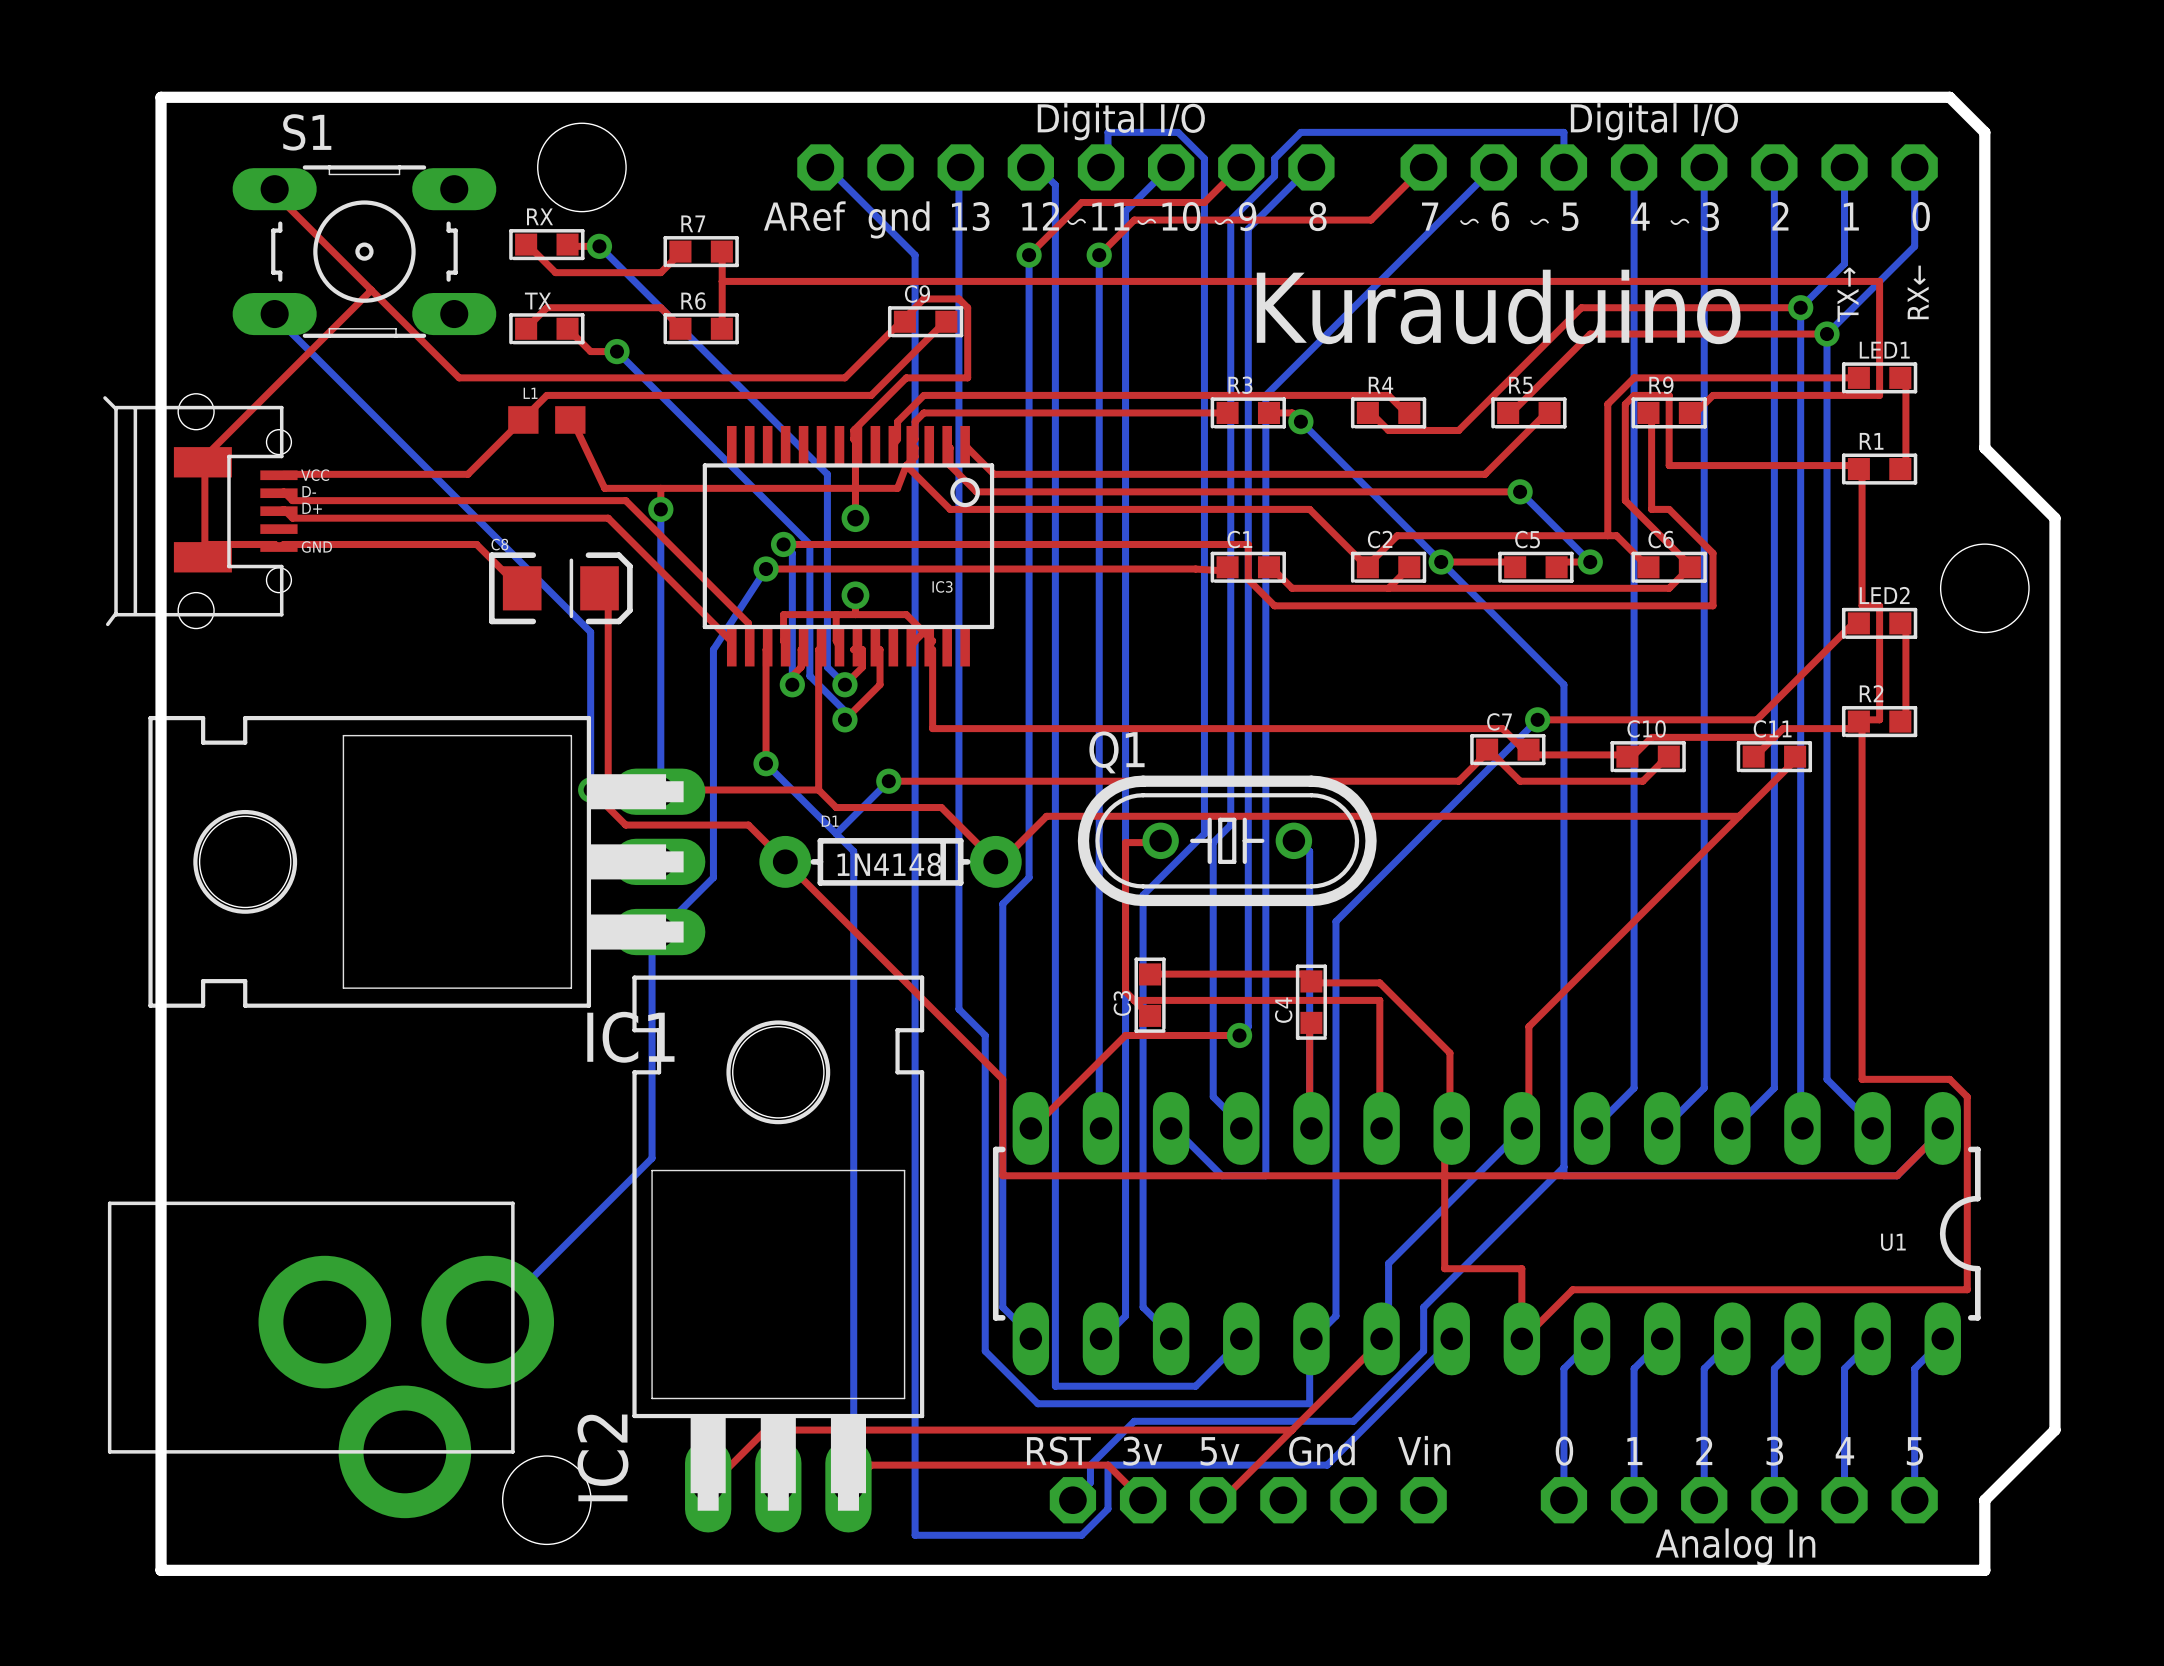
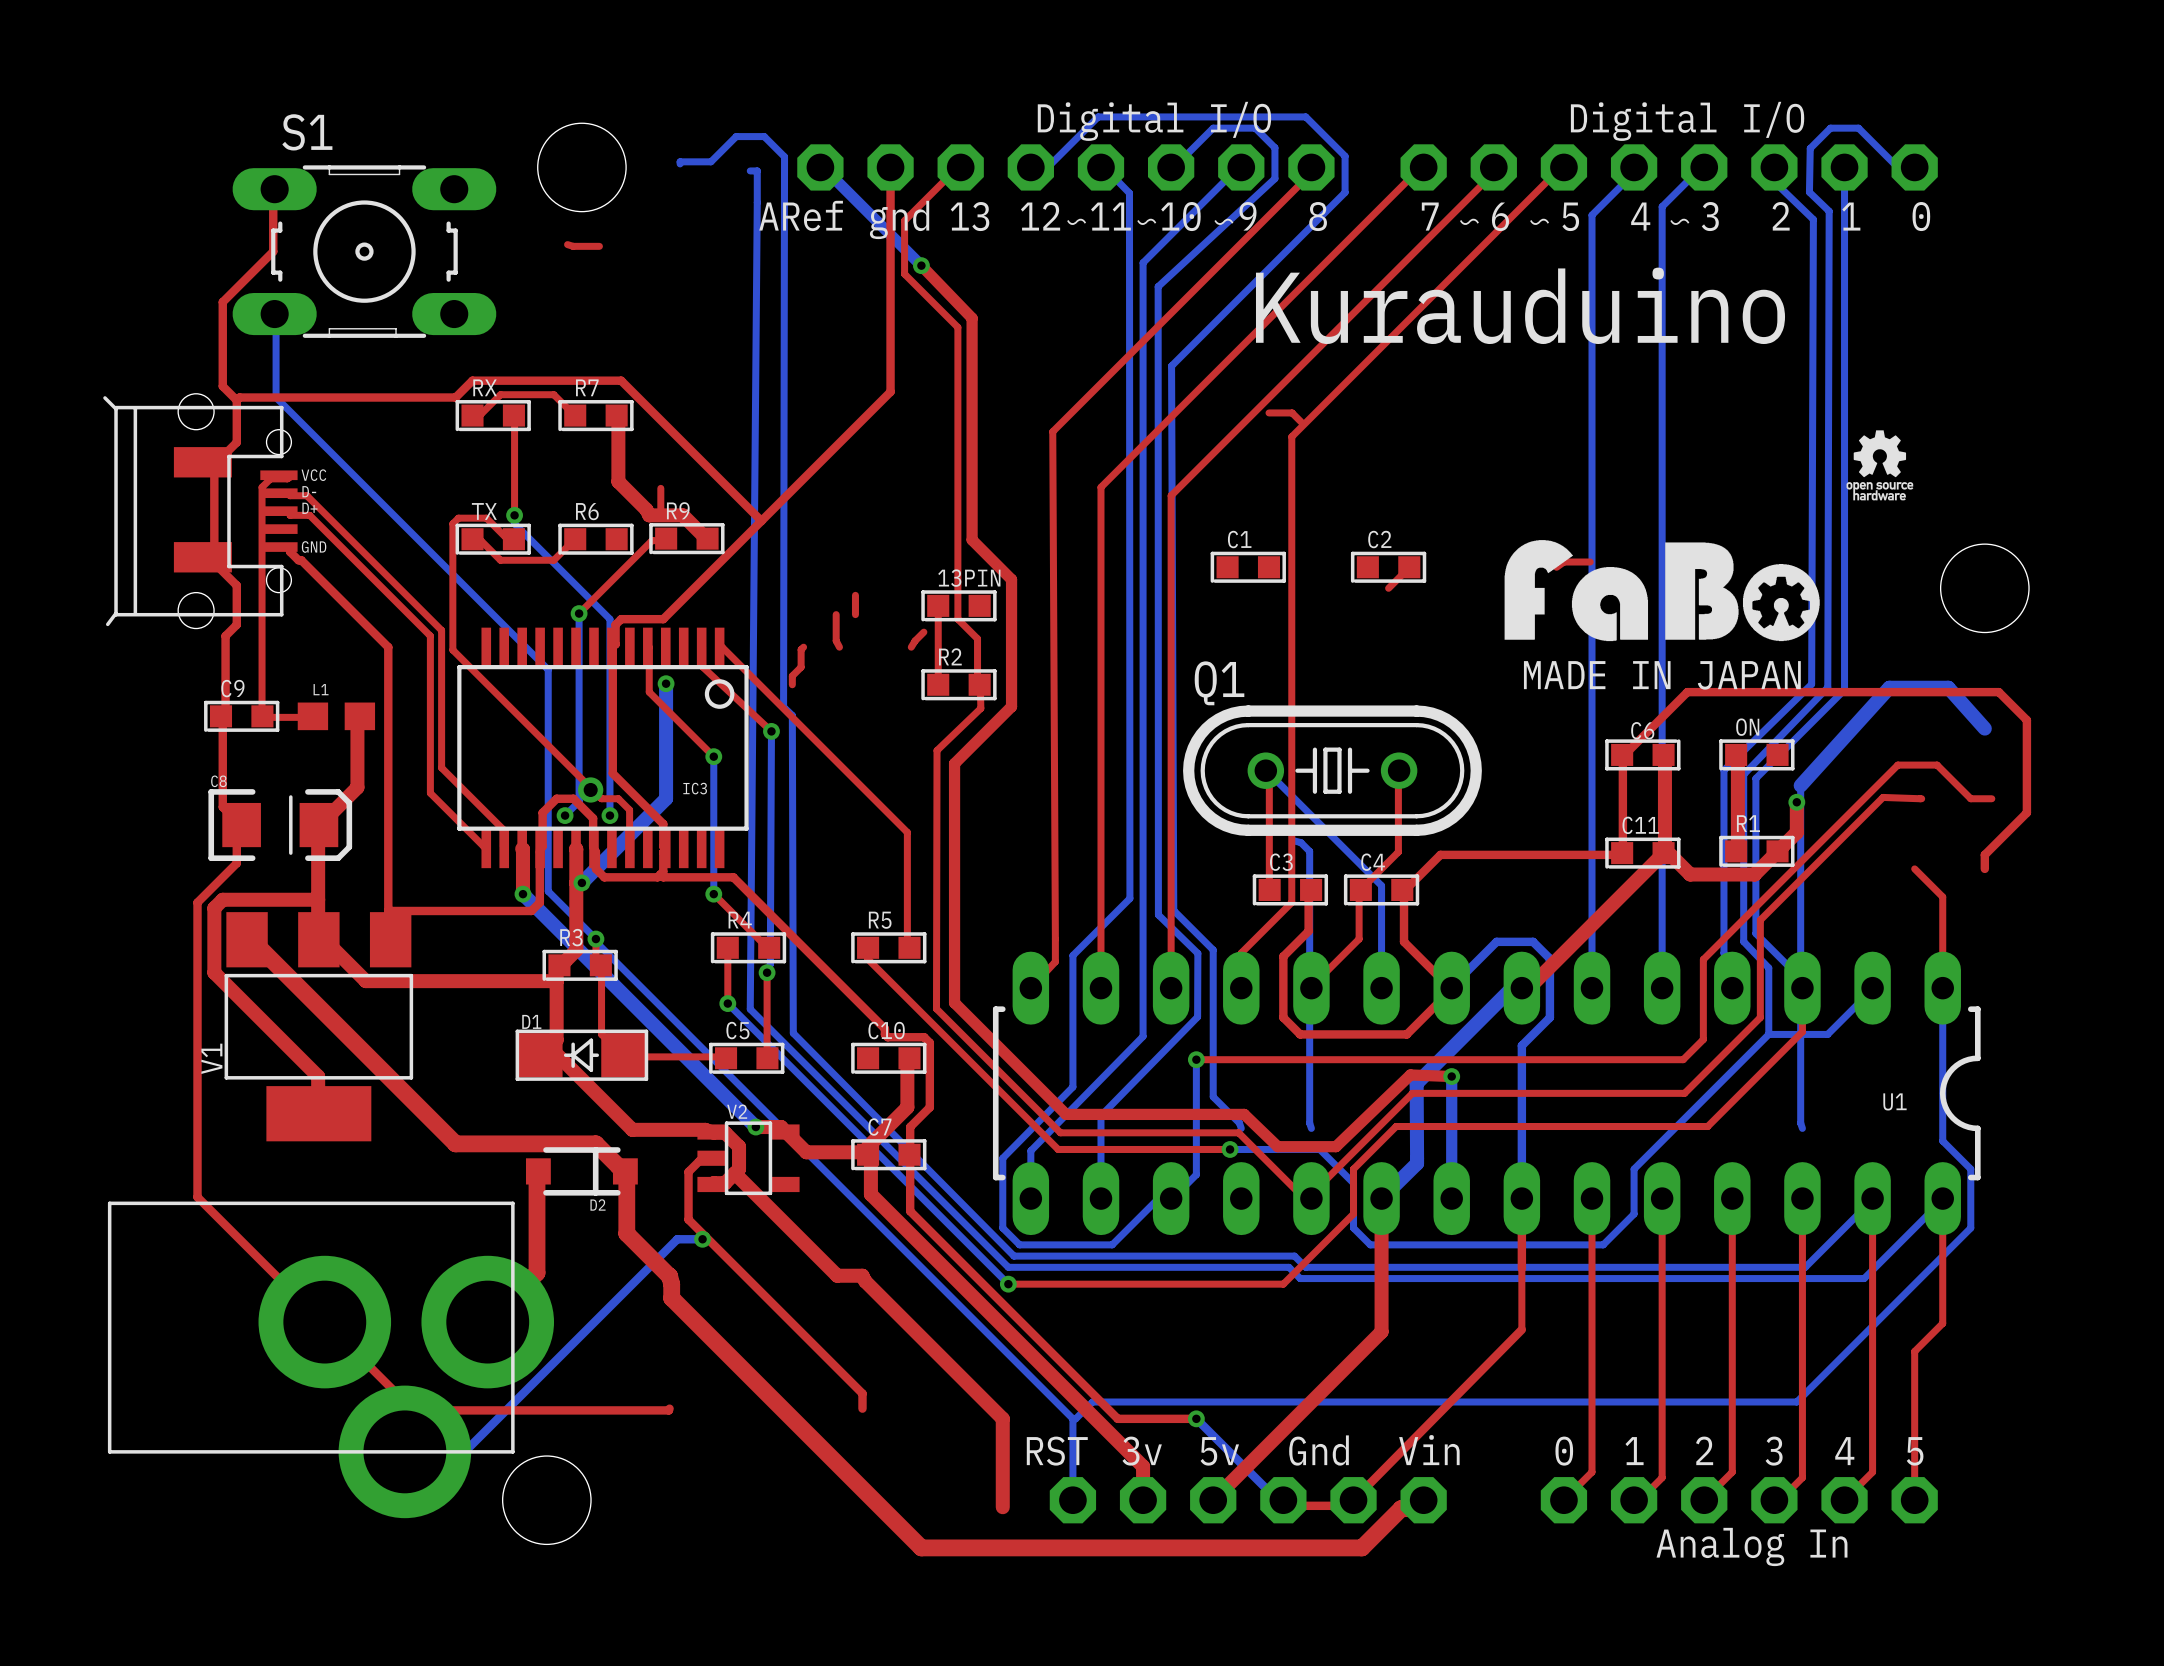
board edge: (161, 97) (1949, 97) (1984, 132) (1984, 448) (2054, 518) (2054, 1430) (1984, 1500) (1984, 1570) (161, 1570) (161, 97) -> none
bottom track: none -> (680, 163) (680, 161) (710, 161) (736, 136) (764, 136) (784, 156) (783, 707) (792, 715) (793, 1033) (1014, 1256) (1294, 1256) (1305, 1267) (1805, 1267) (1872, 1198)
bottom track: none -> (820, 163) (921, 265)
top track: none -> (960, 163) (904, 220) (904, 274) (957, 327) (957, 619) (977, 638) (977, 683) (980, 686) (980, 708) (937, 750) (936, 1008) (1060, 1132) (1238, 1132) (1303, 1197) (1311, 1197)
top track: none -> (1423, 163) (1100, 487) (1100, 988)
top track: none -> (1563, 163) (1291, 436) (1291, 902) (1241, 953) (1241, 988)
bottom track: none -> (1704, 163) (1662, 206) (1662, 988)
bottom track: (820, 167) (827, 167) (915, 255) (915, 1535) (1081, 1535) (1108, 1508) (1108, 1465) (1327, 1465) (1451, 1338) -> none
bottom track: (960, 167) (958, 167) (958, 1009) (985, 1035) (985, 1351) (1037, 1403) (1309, 1403) (1309, 1342) (1335, 1316) (1335, 921) (1537, 719) -> none
bottom track: (1030, 167) (1037, 167) (1055, 184) (1055, 1386) (1195, 1386) (1241, 1338) -> none
bottom track: (1100, 167) (1108, 167) (1108, 132) (1178, 132) (1204, 158) (1204, 833) (1143, 895) -> (1241, 163) (1143, 262) (1143, 895)
bottom track: (1171, 167) (1125, 211) (1125, 1316) (1100, 1338) -> none
top track: (1241, 167) (1204, 202) (1081, 202) (1029, 255) -> none
bottom track: (1311, 167) (1248, 228) (1248, 1026) (1239, 1035) -> none
top track: (1423, 167) (1371, 220) (1134, 220) (1099, 255) -> none
bottom track: (1493, 167) (1265, 395) (1265, 1175) (1221, 1175) (1178, 1131) (1171, 1128) -> none
bottom track: (1563, 167) (1563, 132) (1300, 132) (1274, 158) (1274, 176) (1230, 220) (1230, 825) (1213, 842) (1213, 950) -> (1030, 170) (1044, 170) (1098, 116) (1305, 116) (1345, 156) (1345, 192) (1171, 366) (1173, 910) (1213, 950)
bottom track: (1704, 167) (1704, 1088) (1662, 1128) -> none
bottom track: none -> (750, 170) (757, 170) (750, 1009) (1008, 1267) (1288, 1267) (1300, 1278) (1864, 1278) (1942, 1198)
top track: none -> (890, 170) (890, 391) (663, 619) (621, 619) (615, 624) (615, 644) (611, 646) (612, 773) (663, 824) (663, 846) (665, 848) (663, 852) (663, 871) (657, 877) (604, 877) (595, 868) (595, 852) (593, 846) (593, 818) (573, 798) (556, 798) (542, 812) (542, 846) (539, 852) (539, 902) (531, 910) (388, 910)
bottom track: none -> (1171, 170) (1213, 128) (1255, 128) (1274, 147) (1274, 178) (1158, 286) (1158, 914) (1197, 953) (1197, 1016) (1100, 1115) (1100, 1198)
top track: none -> (1311, 170) (1052, 431) (1055, 961) (1030, 988)
top track: none -> (1493, 170) (1171, 495) (1171, 988)
bottom track: (1914, 170) (1914, 246) (1826, 334) (1826, 1079) (1870, 1123) (1872, 1128) -> (1914, 170) (1900, 170) (1858, 128) (1830, 128) (1810, 148) (1809, 192) (1829, 211) (1827, 687) (1743, 774) (1743, 941) (1768, 967) (1768, 1034)
bottom track: (1634, 173) (1634, 1088) (1592, 1128) -> (1634, 173) (1592, 215) (1592, 988)
bottom track: (1774, 181) (1774, 1088) (1732, 1128) -> (1774, 181) (1813, 219) (1811, 684) (1723, 770) (1723, 953) (1732, 988)
top track: (274, 189) (275, 193) (459, 377) (844, 377) (897, 325) (904, 321) (906, 316) (923, 298) (958, 298) (967, 307) (967, 377) (906, 377) (853, 430) (853, 439) (857, 445) (855, 445) (855, 518) -> (274, 189) (273, 251) (222, 302) (222, 386) (236, 400)
top track: (526, 244) (555, 272) (660, 272) (680, 251) -> none
RX position: (546, 244) -> (493, 415)
bottom track: (599, 246) (827, 474) (827, 667) (844, 684) -> none
via: (599, 246) -> none
R7 position: (701, 251) -> (595, 415)
top track: (721, 251) (721, 328) -> none
bottom track: (1029, 255) (1029, 877) (1002, 903) (1002, 1158) -> (1100, 163) (1129, 193) (1129, 898) (1072, 955) (1072, 1087) (1002, 1158)
via: (1029, 255) -> none
bottom track: (1099, 255) (1099, 1123) (1100, 1128) -> none
via: (1099, 255) -> none
bottom track: (1844, 263) (1800, 307) (1800, 785) -> (1844, 263) (1844, 689) (1755, 778) (1755, 933) (1802, 980) (1802, 988)
top track: none -> (921, 265) (972, 318) (972, 539) (1011, 579) (1011, 706) (954, 763) (954, 1002) (1066, 1114) (1244, 1114) (1277, 1146) (1335, 1146) (1410, 1074) (1451, 1076)
via: none -> (921, 265)
top track: (722, 281) (1879, 281) (1879, 395) (1713, 395) (1695, 412) (1689, 412) -> none
top track: (371, 290) (204, 456) (202, 462) (204, 465) (204, 544) (275, 544) (278, 547) (283, 544) (476, 544) (522, 588) -> none
text: RX← (1918, 292) -> none
text: TX→ (1848, 294) -> none
top track: (1800, 307) (1581, 307) (1458, 430) (1388, 430) (1371, 412) (1367, 412) -> none
via: (1800, 307) -> none
bottom track: (274, 314) (590, 632) (590, 789) -> (274, 314) (276, 397) (548, 669) (548, 891) (595, 939) (595, 941) (1072, 1418)
C9 position: (925, 321) -> (241, 716)
top track: (946, 321) (871, 395) (546, 395) (467, 474) (278, 475) -> none
top track: (526, 328) (546, 307) (660, 307) (680, 328) -> none
TX position: (546, 328) -> (493, 539)
top track: (567, 328) (590, 351) (616, 351) -> none
R6 position: (701, 328) -> (595, 539)
top track: (1826, 334) (1590, 334) (1511, 412) (1508, 412) -> none
via: (1826, 334) -> none
bottom track: (616, 351) (809, 544) (809, 676) (844, 711) (844, 719) -> none
via: (616, 351) -> none
top track: (1858, 377) (1634, 377) (1607, 404) (1607, 535) -> none
LED1: (1879, 377) -> none
top track: (1900, 377) (1905, 377) (1905, 465) (1900, 469) -> none
top track: none -> (236, 400) (236, 442) (213, 464) (213, 559) (214, 563) (236, 585) (236, 624) (225, 636) (225, 714) (220, 716) (222, 717) (222, 807) (241, 825) (236, 826) (236, 863) (197, 902) (197, 1197) (427, 1424) (404, 1451) (444, 1410) (668, 1410) (669, 1408)
top track: none -> (236, 400) (239, 397) (455, 397) (472, 380) (621, 380) (761, 520)
top track: (1227, 412) (923, 412) (915, 421) (915, 439) (911, 445) (915, 448) (915, 456) (906, 465) -> none
R3 position: (1248, 412) -> (580, 965)
R4 position: (1388, 412) -> (748, 947)
top track: (1409, 412) (1406, 412) (1388, 395) (923, 395) (897, 421) (897, 439) (893, 445) -> none
R5 position: (1528, 412) -> (888, 947)
top track: (1549, 412) (1546, 412) (1485, 474) (994, 474) (965, 445) -> none
top track: (1648, 412) (1651, 412) (1651, 509) (1669, 509) (1713, 553) (1713, 605) (1274, 605) (1248, 579) (1248, 544) (783, 544) -> none
R9 position: (1669, 412) -> (686, 538)
top track: none -> (472, 415) (480, 414) (500, 394) (553, 394) (575, 415)
top track: none -> (513, 415) (514, 515)
top track: none -> (616, 415) (618, 417) (618, 481) (646, 509) (649, 515) (682, 515) (707, 538)
L1 position: (546, 419) -> (336, 716)
top track: (570, 419) (573, 421) (604, 488) (897, 488) (906, 465) -> none
bottom track: (1300, 421) (1563, 684) (1563, 1175) (1897, 1175) (1942, 1128) -> none
via: (1300, 421) -> none
drawing: none -> [1846, 430, 1914, 501]
top track: (947, 445) (950, 448) (950, 465) (976, 491) (1520, 491) -> none
top track: (906, 465) (950, 509) (1309, 509) (1367, 567) (1397, 535) (1616, 535) (1648, 567) -> none
R1 position: (1879, 469) -> (1756, 851)
top track: none -> (289, 477) (270, 478) (262, 487) (262, 714) (264, 717) (312, 716)
bottom track: (1520, 491) (1590, 562) -> none
via: (1520, 491) -> none
top track: (278, 493) (283, 491) (292, 500) (625, 500) (748, 623) (749, 647) -> none
top track: none -> (290, 495) (306, 495) (441, 630) (441, 767) (503, 829) (504, 848)
bottom track: (660, 509) (660, 789) (659, 791) -> none
via: (660, 509) -> none
top track: (278, 511) (283, 509) (292, 518) (458, 518) -> (629, 848) (629, 809) (618, 798) (601, 798) (452, 650) (452, 523) (458, 518)
top track: none -> (289, 513) (290, 515) (309, 515) (430, 636) (430, 793) (486, 848)
bottom track: none -> (514, 515) (514, 523) (609, 619) (609, 815)
via: none -> (514, 515)
top track: (486, 518) (608, 518) (730, 640) (731, 647) -> (486, 518) (506, 537) (513, 539)
via: (855, 518) -> none
top track: none -> (666, 538) (666, 540) (652, 540) (579, 613)
top track: none -> (472, 539) (480, 540) (500, 560) (553, 560) (575, 539)
drawing: none -> [1504, 540, 1820, 642]
bottom track: (783, 544) (792, 553) (792, 684) -> none
via: (783, 544) -> none
IC3 position: (848, 546) -> (602, 747)
top track: none -> (289, 549) (298, 560) (301, 560) (388, 647) (388, 939) (390, 939)
top track: (1441, 562) (1511, 562) (1515, 567) -> none
via: (1441, 562) -> none
via: (1590, 562) -> none
top track: (1227, 567) (1221, 570) (1195, 569) (766, 569) -> none
top track: (1269, 567) (1292, 588) (1669, 588) (1689, 567) (1625, 500) (1625, 404) (1634, 395) (1669, 395) (1669, 465) (1853, 465) (1862, 474) (1862, 605) (1879, 605) (1879, 719) (1858, 721) -> none
C5 position: (1535, 567) -> (746, 1058)
C6 rotation: 0° (1669, 567) -> 180° (1642, 754)
C6 position: (1669, 567) -> (1642, 754)
bottom track: (766, 569) (713, 649) (713, 877) (652, 939) (652, 1158) (487, 1322) -> none
via: (766, 569) -> none
C8 position: (560, 588) -> (280, 825)
top track: (599, 588) (608, 588) (608, 781) (643, 781) (652, 789) (659, 791) (660, 789) (818, 789) -> none
via: (855, 595) -> none
top track: none -> (938, 605) (938, 684)
13PIN: none -> (958, 605)
bottom track: none -> (579, 613) (579, 801) (565, 815)
via: none -> (579, 613)
top track: (1858, 623) (1853, 623) (1756, 719) (1537, 719) -> none
LED2: (1879, 623) -> none
top track: (1900, 623) (1905, 623) (1905, 719) (1900, 721) -> none
top track: none -> (647, 646) (649, 692) (713, 756)
top track: none -> (701, 646) (702, 666) (771, 731)
top track: none -> (719, 646) (722, 647) (907, 832) (907, 947) (909, 947)
top track: (767, 647) (766, 649) (766, 763) -> none
top track: (785, 647) (783, 640) (783, 614) (906, 614) (932, 640) (929, 647) (932, 649) (932, 728) (1502, 728) (1520, 746) (1528, 749) (1528, 754) (1625, 754) (1627, 756) (1634, 754) (1651, 737) (1774, 737) -> none
top track: (821, 647) (818, 649) (818, 789) -> none
top track: (857, 647) (853, 649) (862, 649) (862, 667) (844, 684) -> none
top track: (875, 647) (880, 649) (880, 684) (844, 719) -> none
text: none -> MADE IN JAPAN (1662, 675)
bottom track: none -> (666, 683) (666, 798) (581, 882)
via: none -> (666, 683)
via: (792, 684) -> none
via: (844, 684) -> none
top track: none -> (359, 716) (357, 717) (357, 787) (318, 825) (318, 939) (323, 944) (329, 944) (365, 981) (556, 981)
via: (844, 719) -> none
via: (1537, 719) -> none
top track: (1858, 721) (1862, 728) (1862, 1079) (1949, 1079) (1967, 1096) (1967, 1289) (1572, 1289) (1521, 1338) (1521, 1329) -> (1283, 1507) (1347, 1505) (1521, 1329)
top track: (1858, 721) (1853, 728) (1783, 728) (1753, 756) -> none
R2 position: (1879, 721) -> (958, 684)
bottom track: none -> (1984, 728) (1948, 687) (1889, 687) (1800, 785)
bottom track: none -> (771, 731) (770, 963) (767, 972)
via: none -> (771, 731)
C7 position: (1507, 749) -> (888, 1154)
top track: none -> (1663, 754) (1663, 853)
top track: none -> (1736, 754) (1737, 756) (1737, 849) (1736, 851)
ON: none -> (1756, 754)
bottom track: none -> (713, 756) (713, 894)
via: none -> (713, 756)
C10 position: (1648, 756) -> (888, 1058)
top track: (1668, 756) (1642, 781) (1520, 781) (1487, 749) (1485, 754) (1458, 781) (888, 781) -> none
C11 position: (1774, 756) -> (1642, 853)
top track: (1795, 756) (1791, 763) (1528, 1026) (1528, 1123) (1521, 1128) -> none
bottom track: (766, 763) (853, 851) (853, 1482) (848, 1486) -> none
via: (766, 763) -> none
top track: none -> (1265, 770) (1269, 773) (1269, 889)
bottom track: none -> (1265, 770) (1381, 885) (1381, 988)
top track: none -> (1399, 770) (1398, 852) (1359, 891) (1359, 939) (1311, 988)
bottom track: (888, 781) (836, 833) -> none
via: (888, 781) -> none
top track: (590, 789) (625, 825) (748, 825) (1002, 1079) (1002, 1175) (1897, 1175) (1942, 1128) -> none
top track: (818, 789) (836, 807) (941, 807) (995, 861) (1002, 860) (1046, 816) (1739, 816) -> none
top track: none -> (1921, 798) (1883, 797) (1760, 920) (1760, 1017) (1684, 1093) (1412, 1093) (1311, 1194) (1311, 1198)
top track: none -> (1991, 798) (1970, 798) (1937, 765) (1897, 765) (1703, 959) (1703, 1039) (1683, 1059) (1196, 1059)
top track: none -> (1796, 802) (1796, 832) (1754, 874) (1690, 874) (1670, 854) (1663, 853)
via: none -> (1796, 802)
via: none -> (565, 815)
via: none -> (609, 815)
D1 footprint: [759, 835, 1022, 888] -> [515, 1029, 649, 1081]
top track: (1160, 840) (1160, 842) (1125, 842) (1125, 991) (1150, 1015) -> none
Q1 position: (1227, 840) -> (1332, 770)
top track: none -> (522, 848) (522, 894)
top track: none -> (576, 849) (576, 950) (556, 967) (556, 1040) (540, 1055) (553, 1051) (632, 1129) (705, 1129) (713, 1132) (725, 1132) (739, 1146) (739, 1169) (725, 1183) (711, 1184)
top track: none -> (1663, 853) (1530, 986) (1521, 988)
IC1: (426, 861) -> none
D1 value: 1N4148 (889, 864) -> none
top track: none -> (1914, 868) (1942, 896) (1942, 988)
top track: none -> (1984, 868) (1984, 854) (2026, 812) (2026, 720) (1998, 692) (1687, 692) (1625, 753) (1622, 754) (1622, 852) (1620, 854) (1440, 854) (1406, 888) (1402, 889) (1404, 891) (1404, 941) (1451, 988) (1406, 1034) (1300, 1034) (1283, 1017) (1283, 956) (1308, 931) (1308, 891) (1311, 889)
top track: none -> (660, 874) (663, 877) (733, 877) (884, 1028) (884, 1034) (887, 1037) (924, 1037) (929, 1042) (929, 1107) (910, 1127) (910, 1211) (1117, 1418) (1196, 1418)
via: none -> (581, 882)
bottom track: none -> (522, 894) (755, 1127)
via: none -> (522, 894)
top track: none -> (713, 894) (769, 947)
via: none -> (713, 894)
top track: none -> (318, 899) (222, 899) (214, 908) (214, 972) (318, 1076) (318, 1113)
top track: none -> (247, 939) (248, 941) (253, 941) (455, 1143) (595, 1143) (618, 1166) (626, 1171) (626, 1233) (669, 1276) (671, 1298) (921, 1547) (1361, 1547) (1401, 1508) (1423, 1507)
top track: none -> (595, 939) (595, 961) (601, 967) (601, 1034) (623, 1056) (726, 1058)
via: none -> (595, 939)
top track: none -> (727, 947) (727, 1003)
top track: none -> (868, 947) (867, 959) (1058, 1149) (1230, 1149)
top track: none -> (767, 972) (767, 1058)
via: none -> (767, 972)
top track: (1150, 974) (1309, 974) (1311, 981) (1318, 982) (1379, 982) (1449, 1053) (1449, 1123) (1451, 1128) (1444, 1128) (1444, 1268) (1521, 1268) -> (1521, 1198) (1521, 1268)
bottom track: none -> (1451, 988) (1496, 941) (1533, 941) (1549, 958) (1549, 1017) (1521, 1045) (1521, 1198)
bottom track: none -> (1521, 988) (1510, 989) (1416, 1083) (1417, 1163) (1381, 1198)
top track: none -> (1802, 988) (1802, 1031) (1707, 1126) (1396, 1126) (1353, 1169) (1353, 1214) (1283, 1284) (1008, 1284)
bottom track: none -> (1872, 988) (1827, 1034) (1768, 1034)
bottom track: none -> (1942, 988) (1942, 1141) (1970, 1169) (1970, 1228) (1796, 1402) (1092, 1402) (1075, 1418) (1072, 1418)
C3 rotation: 0° (1150, 995) -> 90° clockwise (1290, 889)
C3 position: (1150, 995) -> (1290, 889)
top track: (1134, 1000) (1379, 1000) (1379, 1123) (1381, 1128) -> none
C4 rotation: 0° (1311, 1002) -> 90° clockwise (1381, 889)
C4 position: (1311, 1002) -> (1381, 889)
bottom track: none -> (727, 1003) (1008, 1284)
via: none -> (727, 1003)
top track: (1311, 1022) (1309, 1026) (1309, 1123) (1311, 1128) -> none
V1: none -> (318, 1026)
bottom track: none -> (1768, 1034) (1634, 1169) (1634, 1214) (1603, 1244) (1370, 1244) (1353, 1228) (1353, 1183) (1319, 1149) (1230, 1149)
top track: (1239, 1035) (1125, 1035) (1030, 1128) -> none
via: (1239, 1035) -> none
bottom track: (1143, 1036) (1143, 1307) (1169, 1333) (1171, 1338) -> (1143, 1036) (1030, 1150) (1030, 1198)
top track: none -> (909, 1058) (907, 1059) (907, 1107) (868, 1146) (868, 1154)
via: none -> (1196, 1059)
bottom track: none -> (1451, 1076) (1451, 1198)
via: none -> (1451, 1076)
top track: none -> (755, 1127) (781, 1127) (806, 1152) (865, 1152) (868, 1154)
via: none -> (755, 1127)
bottom track: (1521, 1128) (1388, 1263) (1388, 1333) (1381, 1338) -> none
via: none -> (1230, 1149)
top track: none -> (868, 1154) (870, 1160) (870, 1194) (1143, 1466) (1143, 1507)
top track: none -> (711, 1158) (710, 1160) (699, 1160) (688, 1171) (688, 1219) (862, 1393) (862, 1408)
V2: none -> (748, 1158)
bottom track: (1563, 1167) (1423, 1307) (1423, 1351) (1353, 1421) (1134, 1421) (1090, 1465) (1090, 1482) (1072, 1500) -> (1072, 1418) (1072, 1500)
top track: none -> (538, 1171) (537, 1272) (487, 1322)
D2: none -> (581, 1171)
top track: none -> (734, 1173) (837, 1275) (862, 1275)
top track: none -> (1592, 1198) (1592, 1472) (1563, 1500)
top track: none -> (1662, 1198) (1662, 1477) (1634, 1507)
top track: none -> (1732, 1198) (1732, 1472) (1704, 1500)
top track: none -> (1802, 1198) (1802, 1477) (1774, 1507)
top track: none -> (1872, 1198) (1872, 1472) (1844, 1500)
top track: none -> (1942, 1198) (1942, 1323) (1914, 1351) (1914, 1507)
bottom track: (1002, 1228) (1002, 1307) (1029, 1333) (1030, 1338) -> (1002, 1228) (1019, 1244) (1112, 1244) (1157, 1199) (1171, 1199) (1196, 1174) (1196, 1059)
U1 position: (1486, 1233) -> (1486, 1093)
bottom track: none -> (702, 1239) (677, 1239) (466, 1449) (405, 1449) (404, 1451)
via: none -> (702, 1239)
IC2: (778, 1254) -> none
top track: none -> (862, 1276) (865, 1281) (1002, 1418) (1002, 1507)
via: none -> (1008, 1284)
top track: (1381, 1338) (1221, 1500) (1213, 1500) -> (1381, 1198) (1381, 1331) (1213, 1500)
bottom track: (1592, 1338) (1563, 1368) (1563, 1500) -> none
bottom track: (1662, 1338) (1634, 1368) (1634, 1500) -> none
bottom track: (1732, 1338) (1704, 1368) (1704, 1500) -> none
bottom track: (1802, 1338) (1774, 1368) (1774, 1500) -> none
bottom track: (1872, 1338) (1844, 1368) (1844, 1500) -> none
bottom track: (1942, 1338) (1914, 1368) (1914, 1500) -> none
bottom track: none -> (1196, 1418) (1283, 1507)
via: none -> (1196, 1418)
top track: (1292, 1430) (766, 1430) (708, 1486) -> none
top track: (848, 1486) (871, 1465) (1108, 1465) (1143, 1500) -> none

